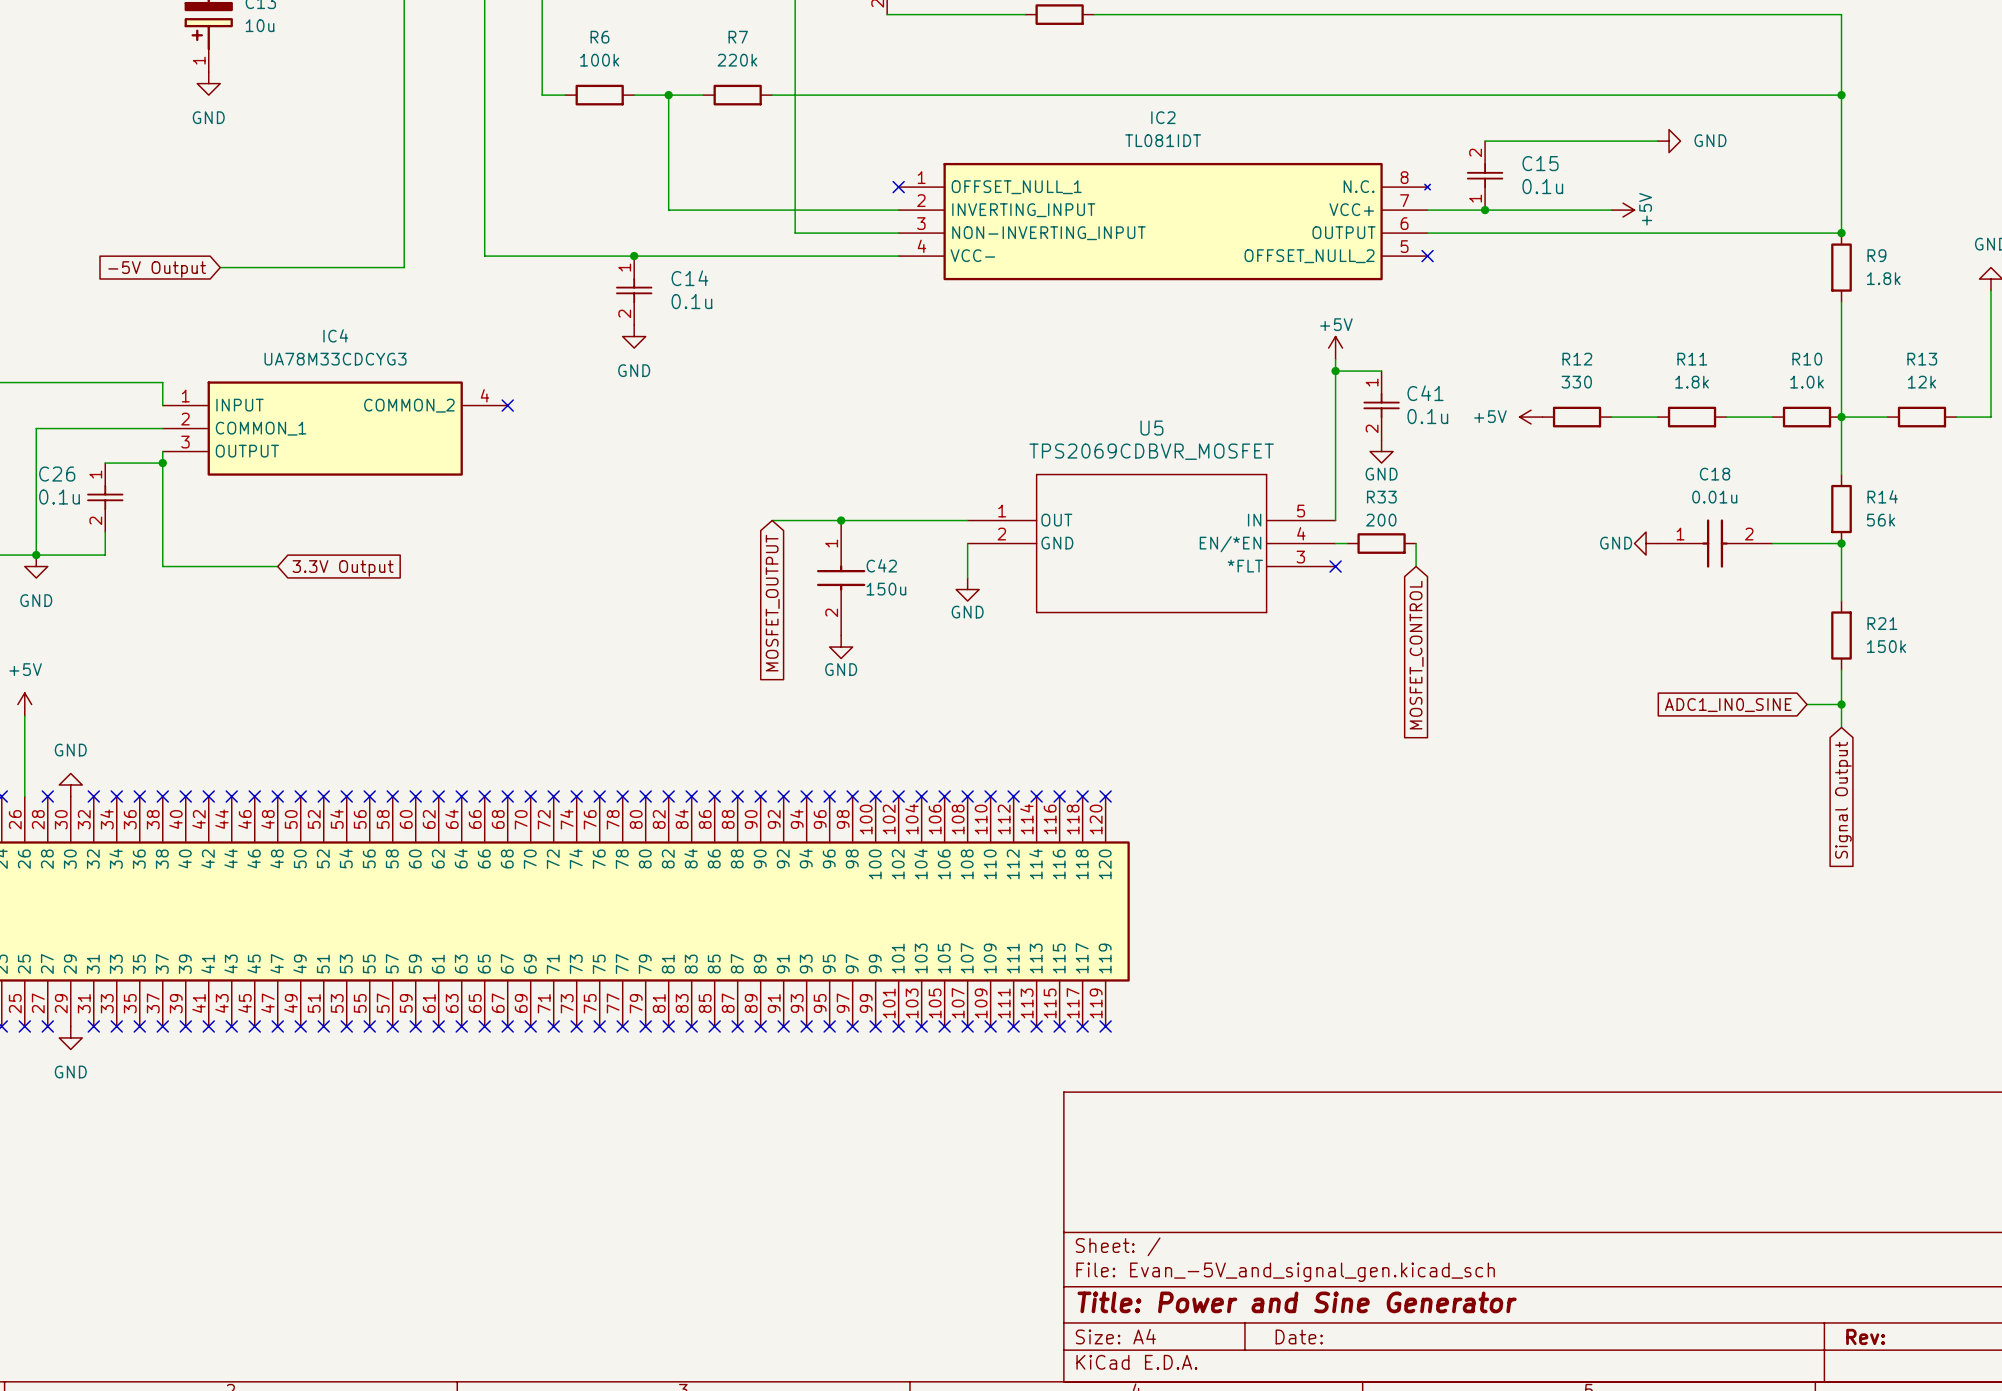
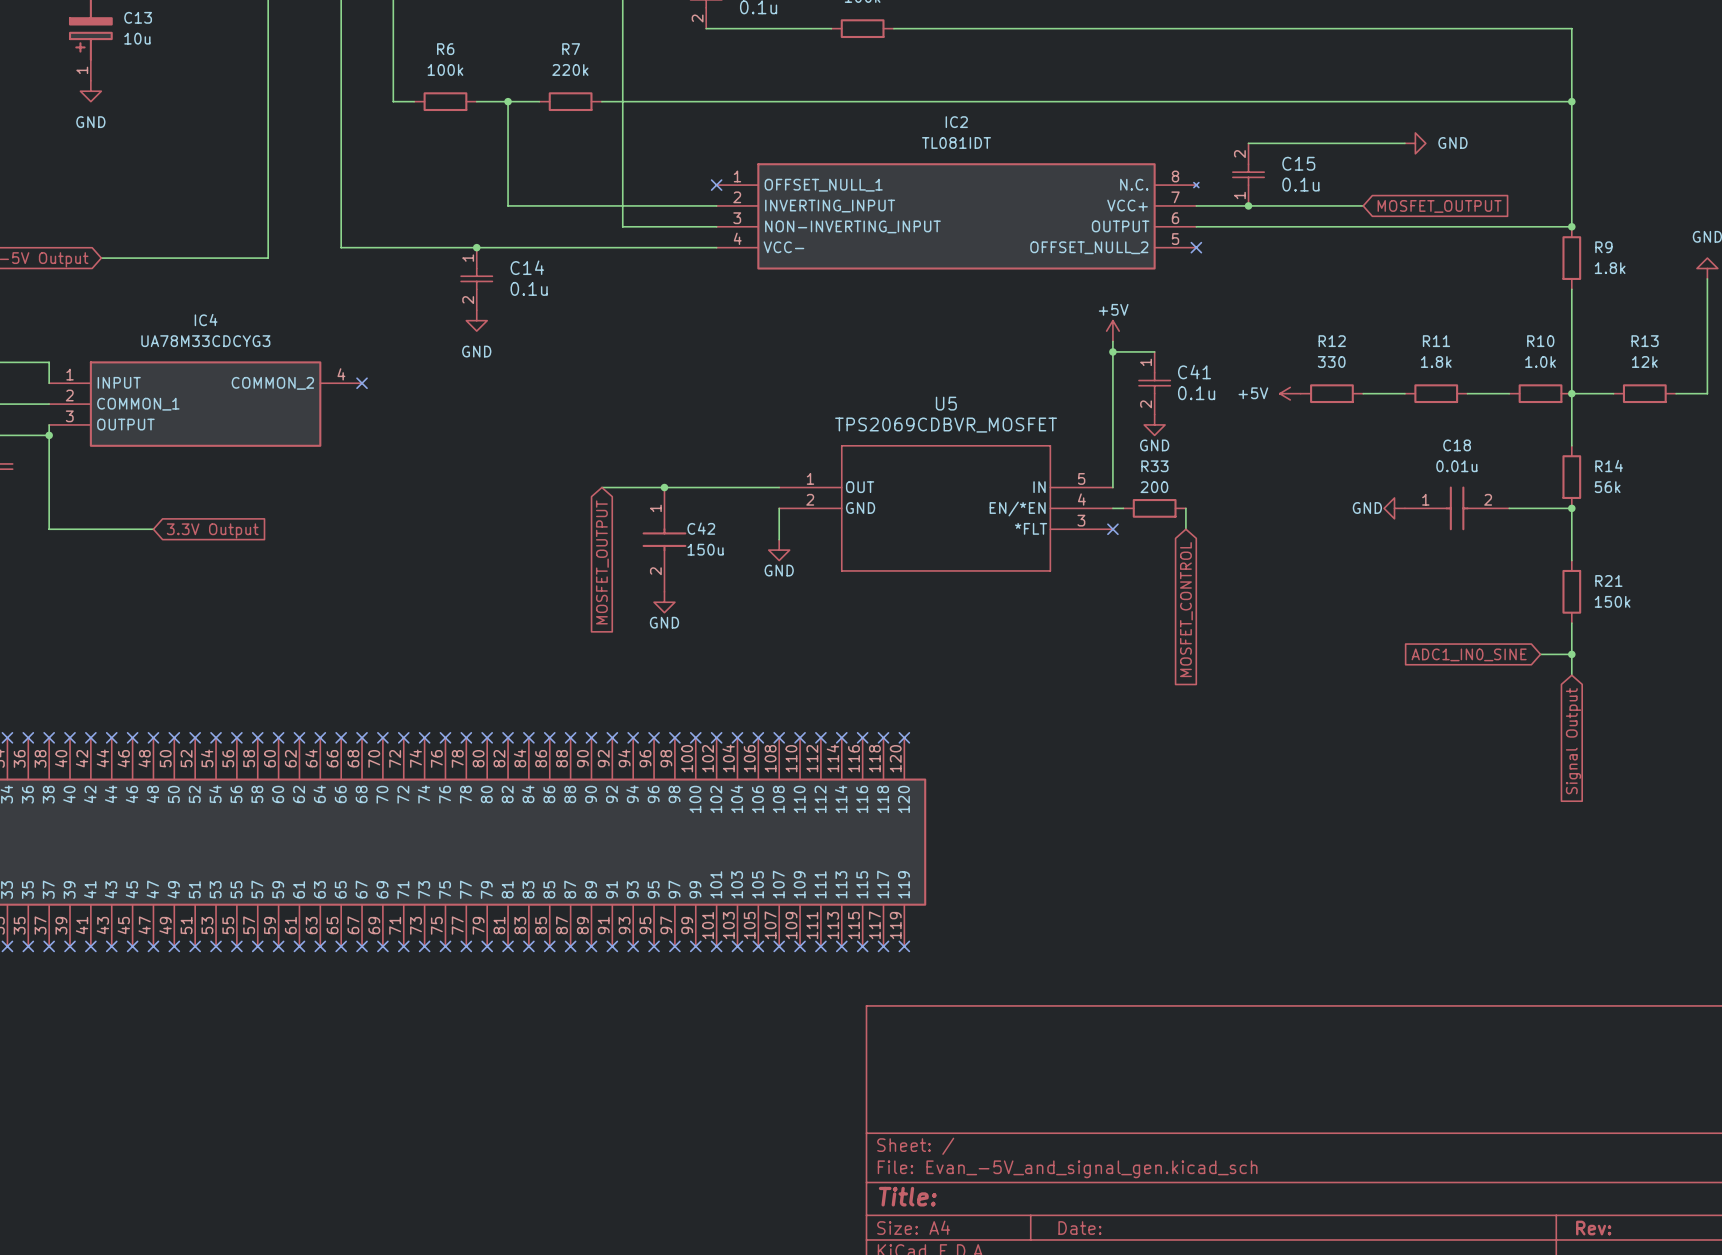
power symbol: +5V (1623, 210) -> none
global label: none -> MOSFET_OUTPUT (1439, 206)
title block: Title: Power and Sine Generator (1297, 1302) -> Title: (907, 1196)

